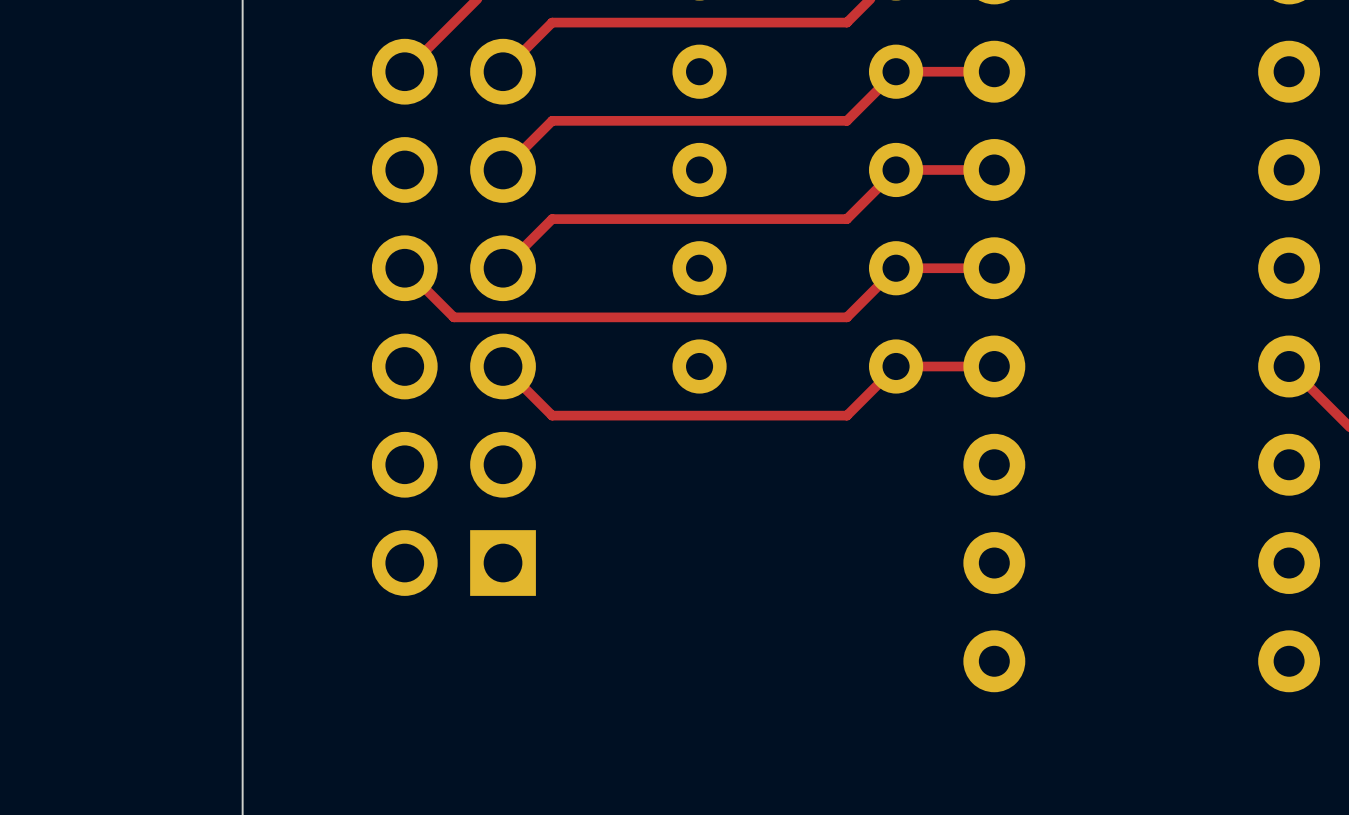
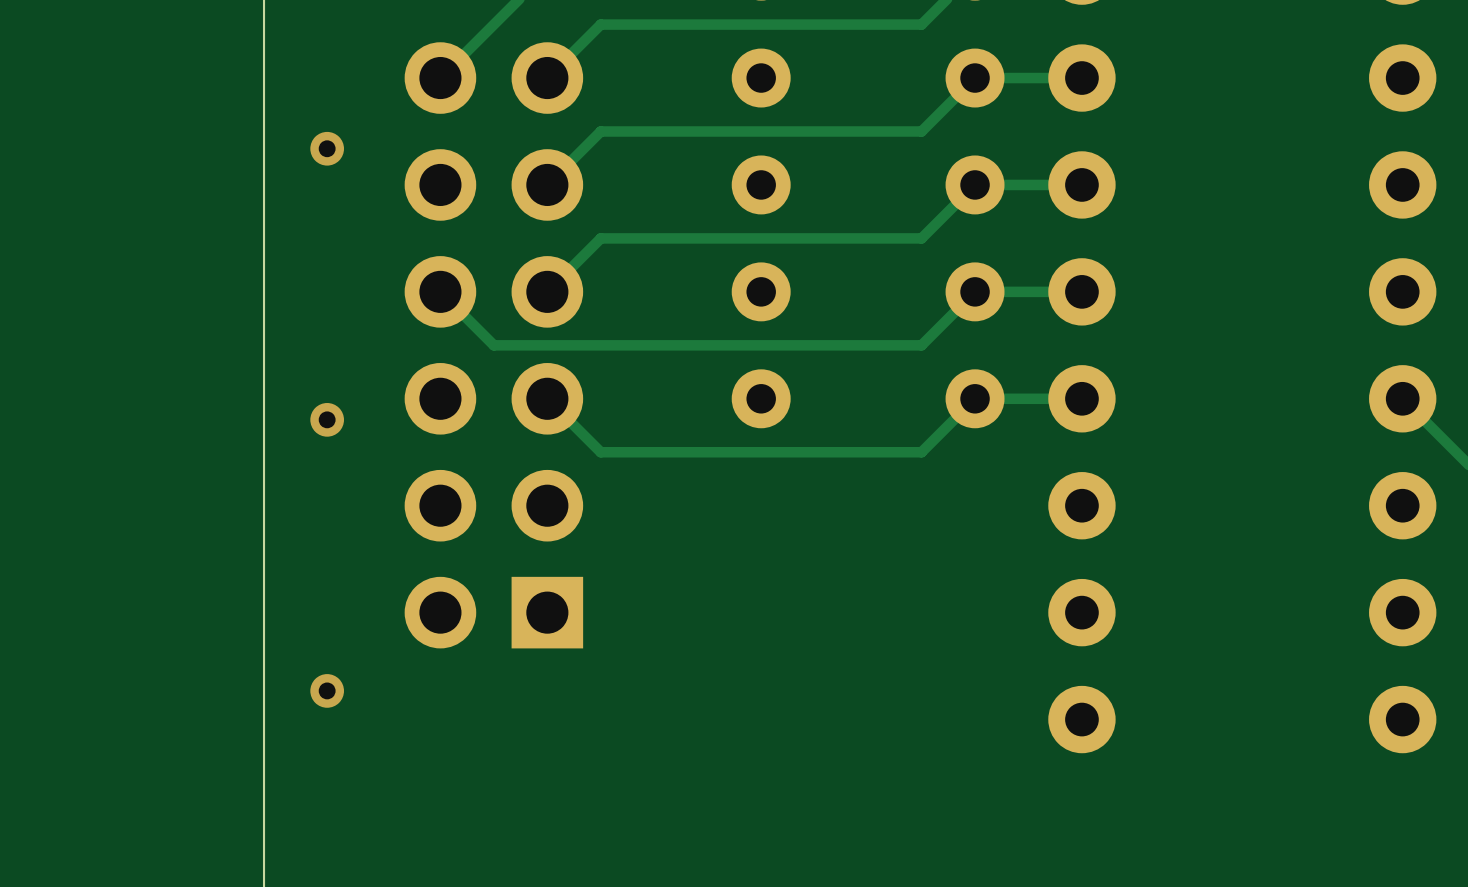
via: none -> (327, 148)
via: none -> (327, 419)
via: none -> (327, 690)

